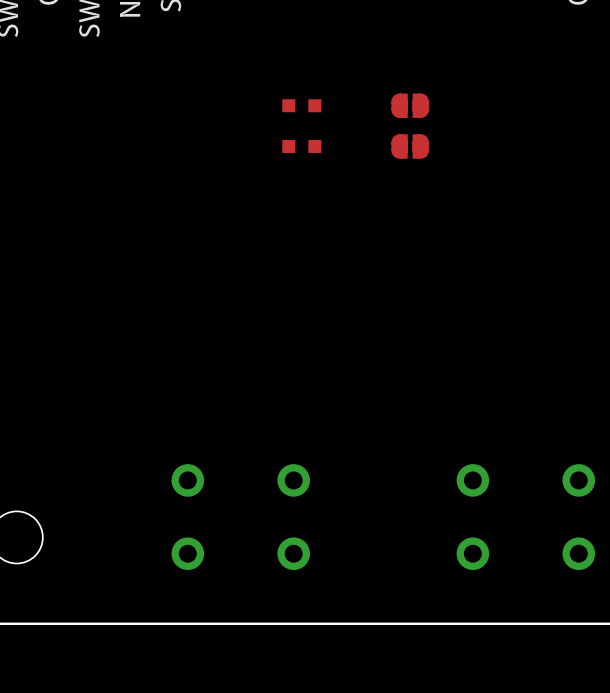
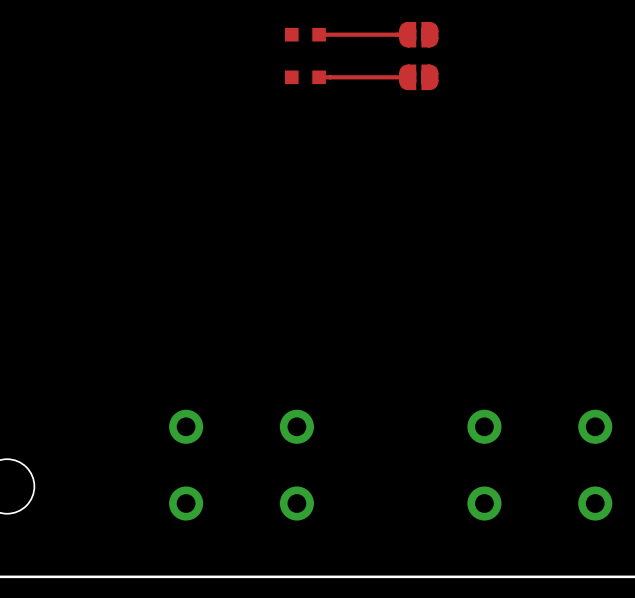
top track: none -> (407, 34) (319, 34)
top track: none -> (407, 77) (319, 77)

